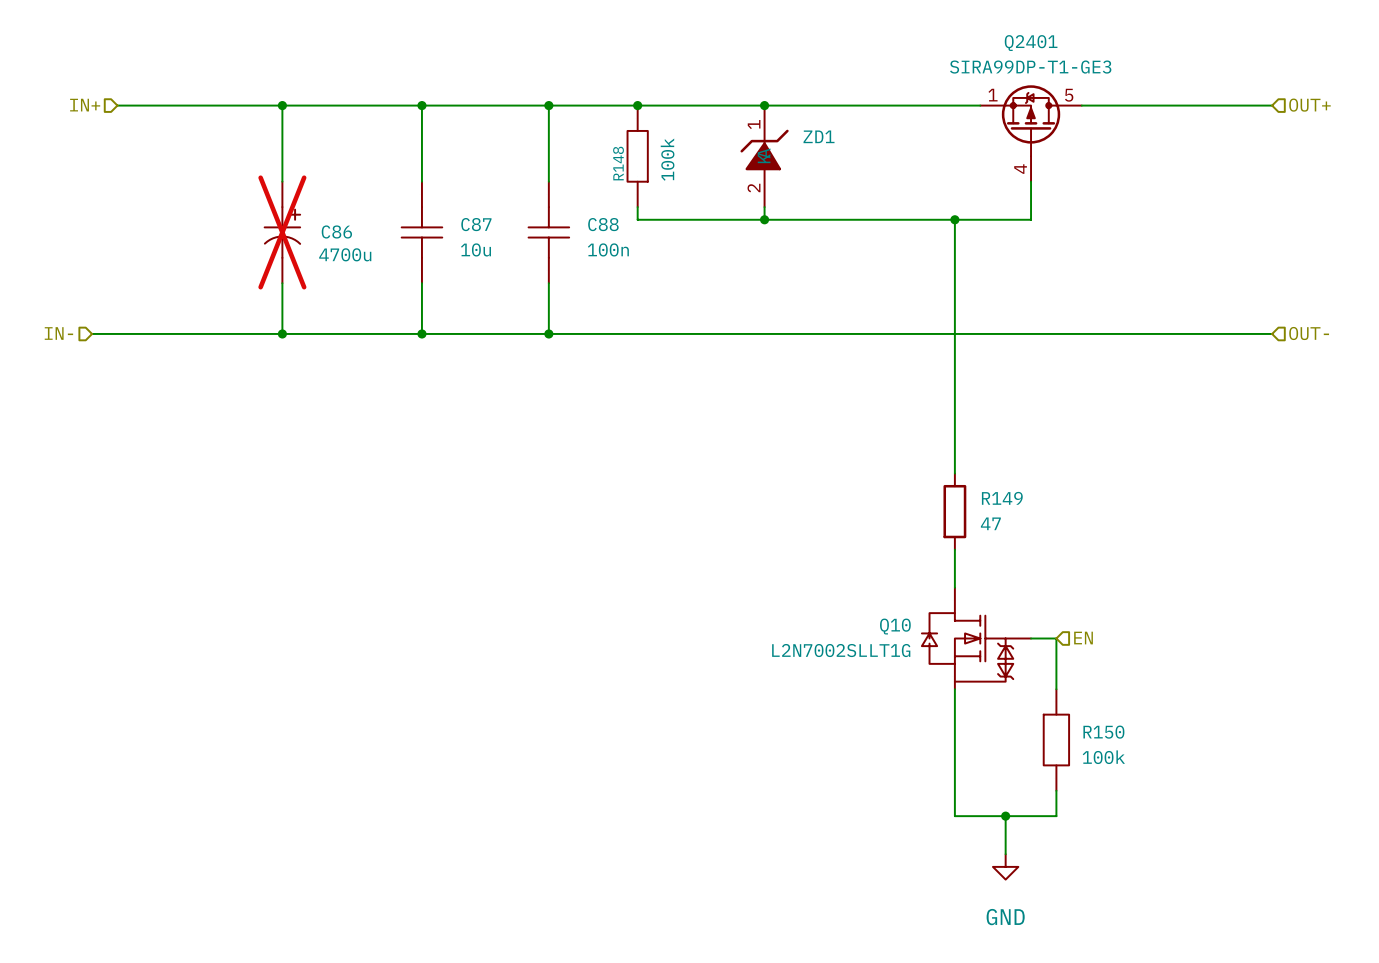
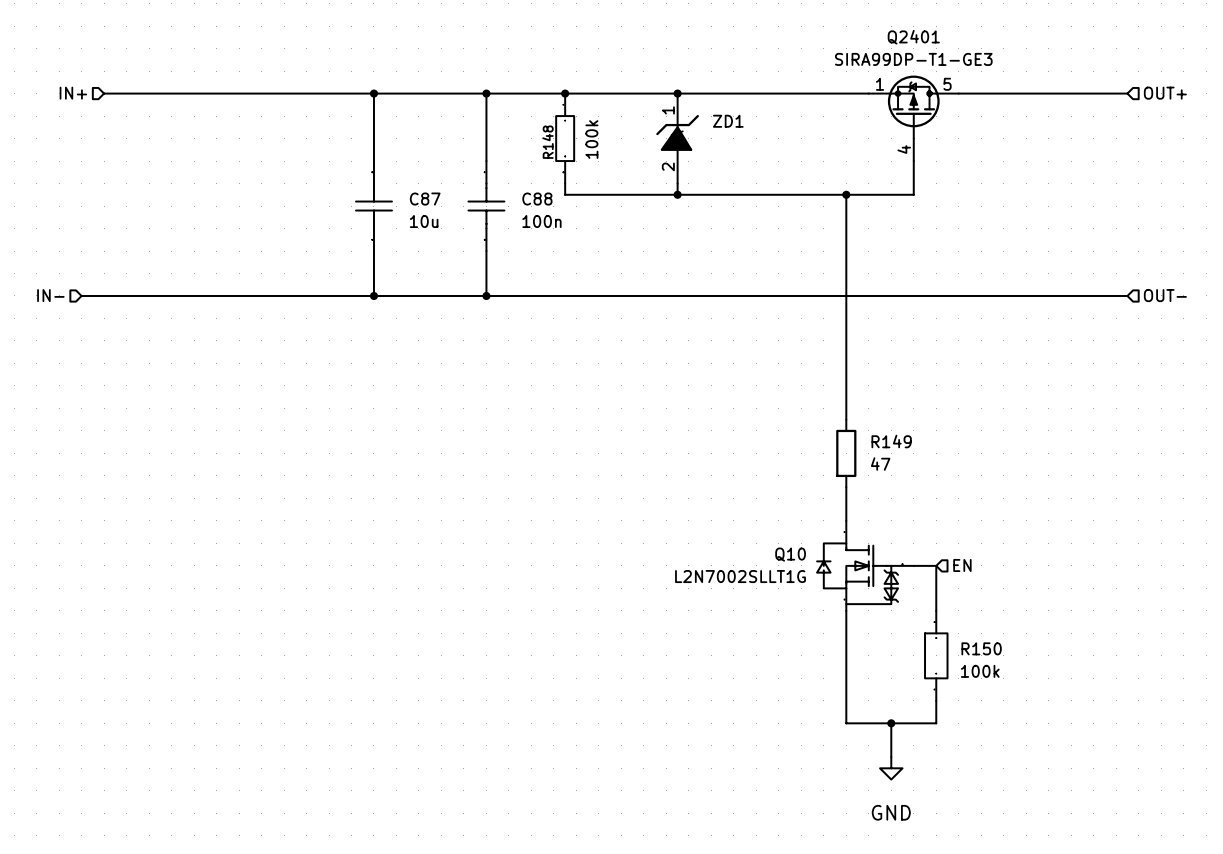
wire: (282, 105) (282, 181) -> none
junction: (282, 105) -> none
C86: 4700u (282, 232) -> none
wire: (282, 283) (282, 333) -> none
junction: (282, 333) -> none

